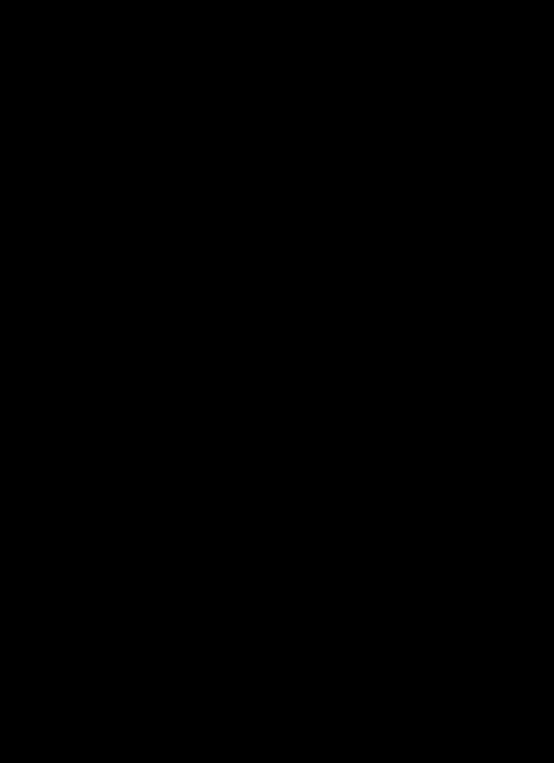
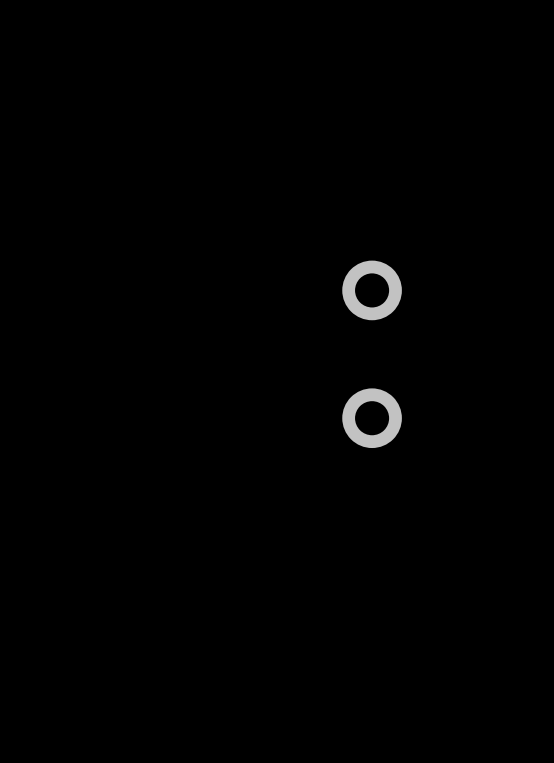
via: none -> (372, 290)
via: none -> (372, 418)

